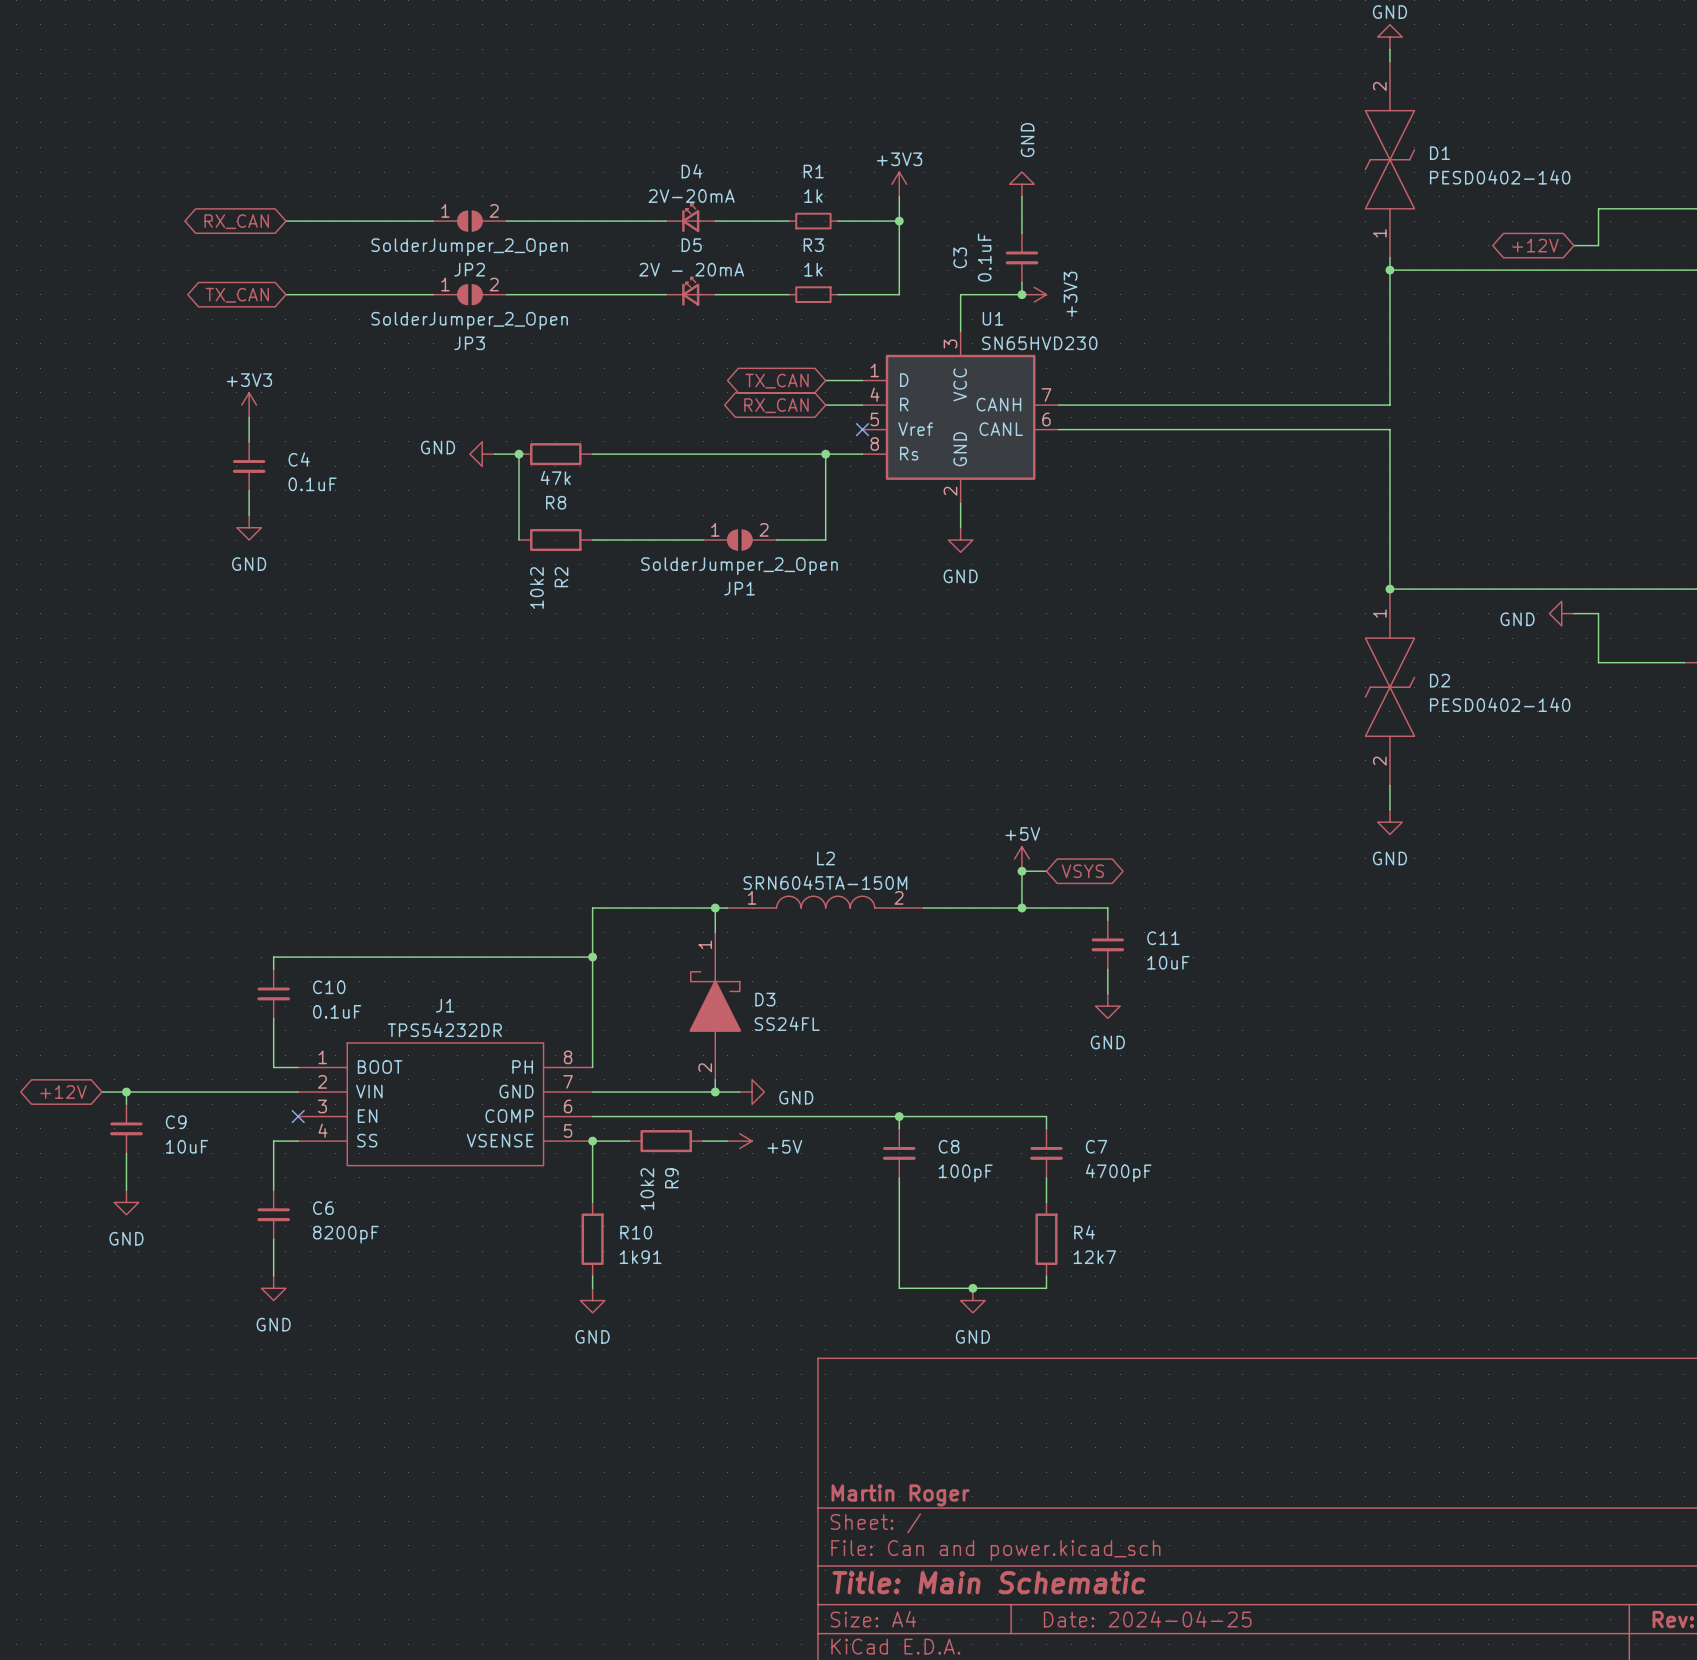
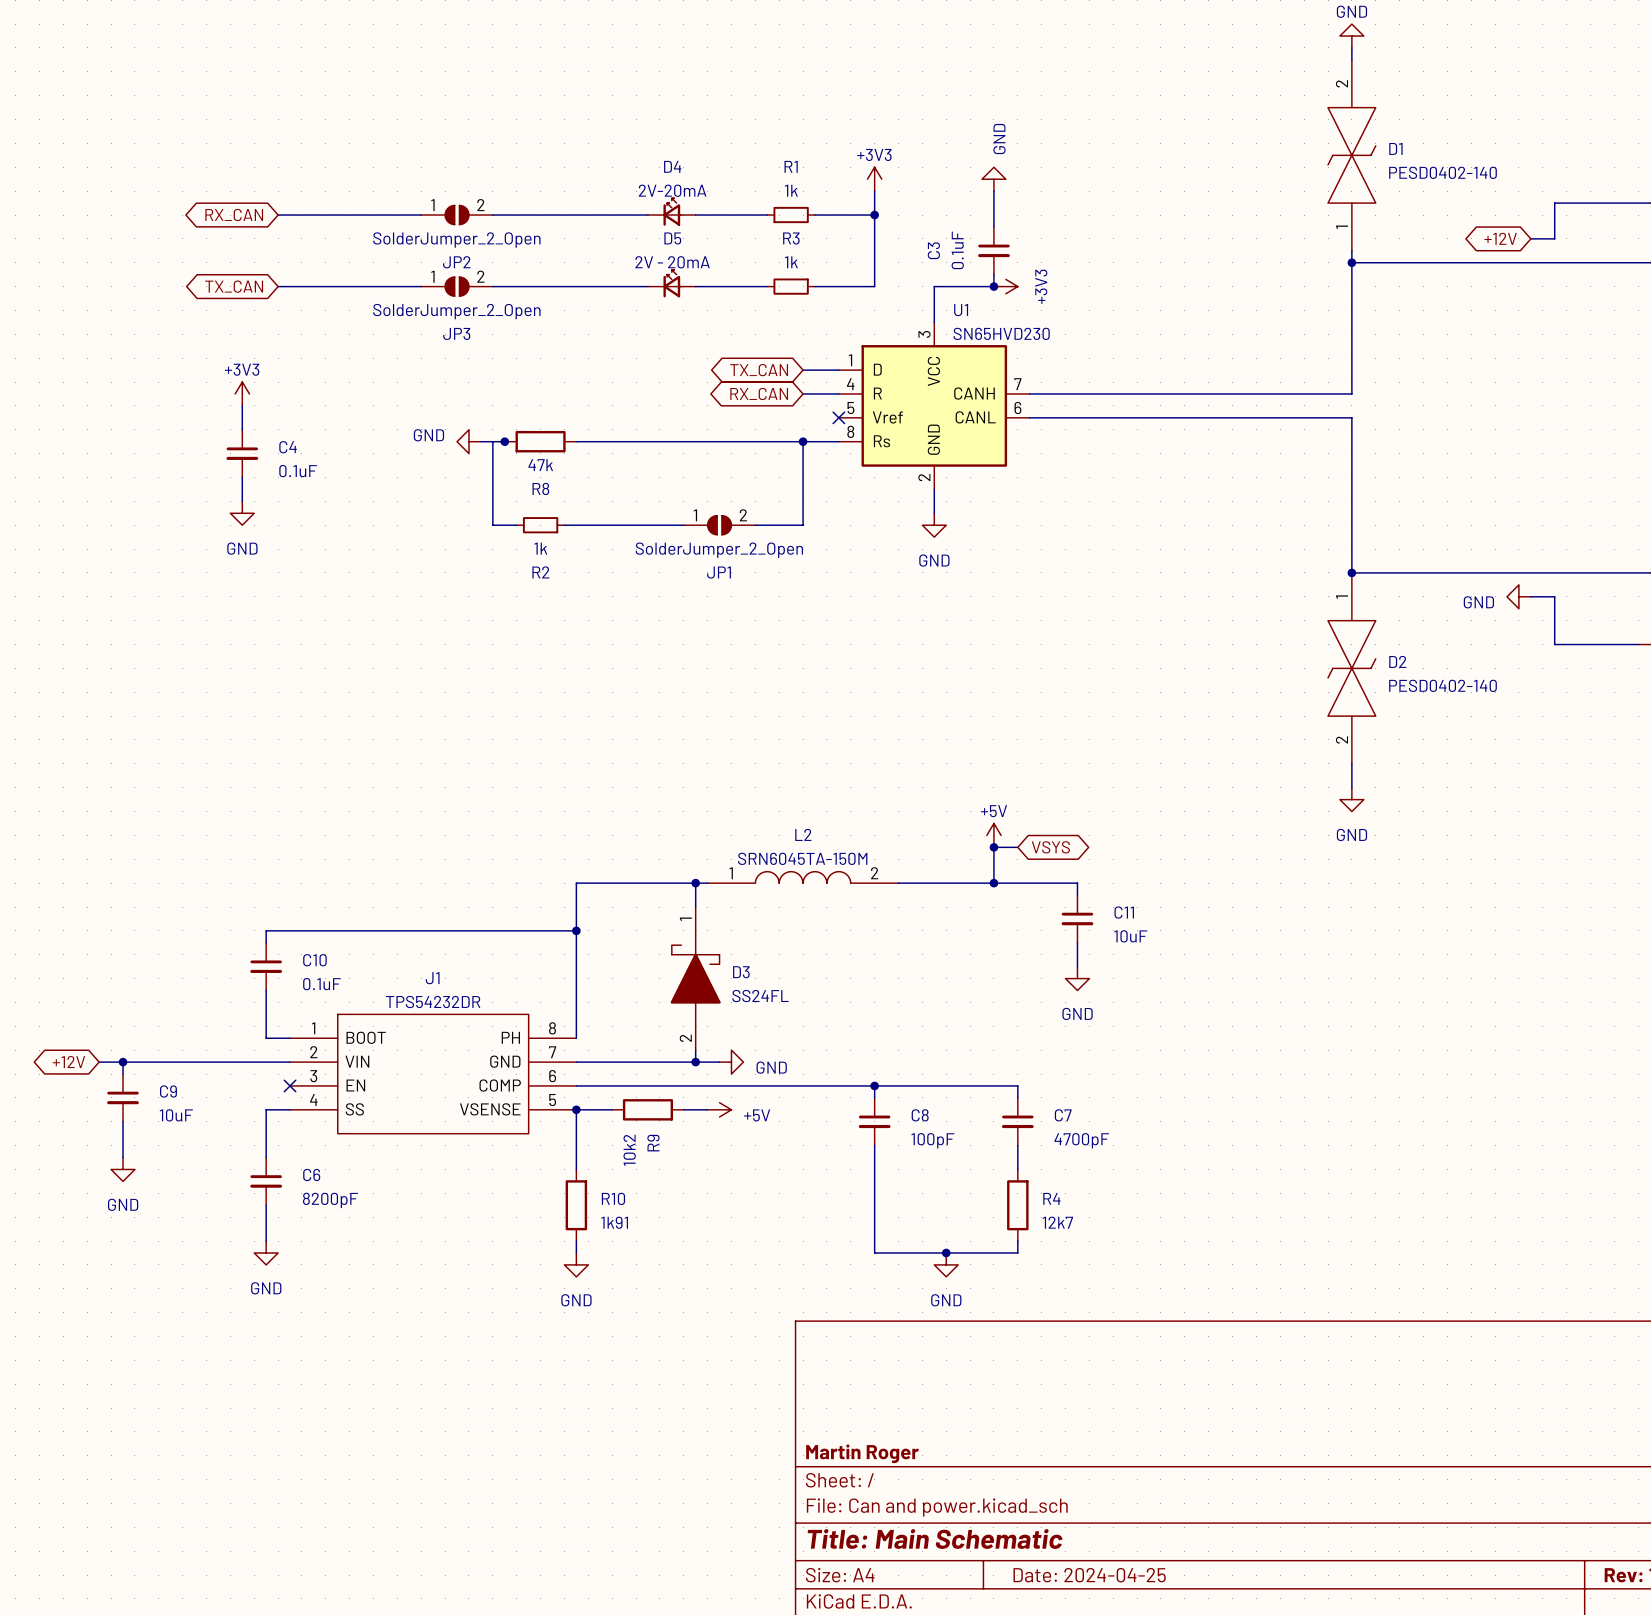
wire: none -> (492, 441) (492, 525) (516, 525)
wire: (519, 454) (519, 540) -> none
R2 symbol: [519, 528, 593, 552] -> [516, 517, 565, 534]
R2 value: 10k2 (536, 588) -> 1k (540, 548)

